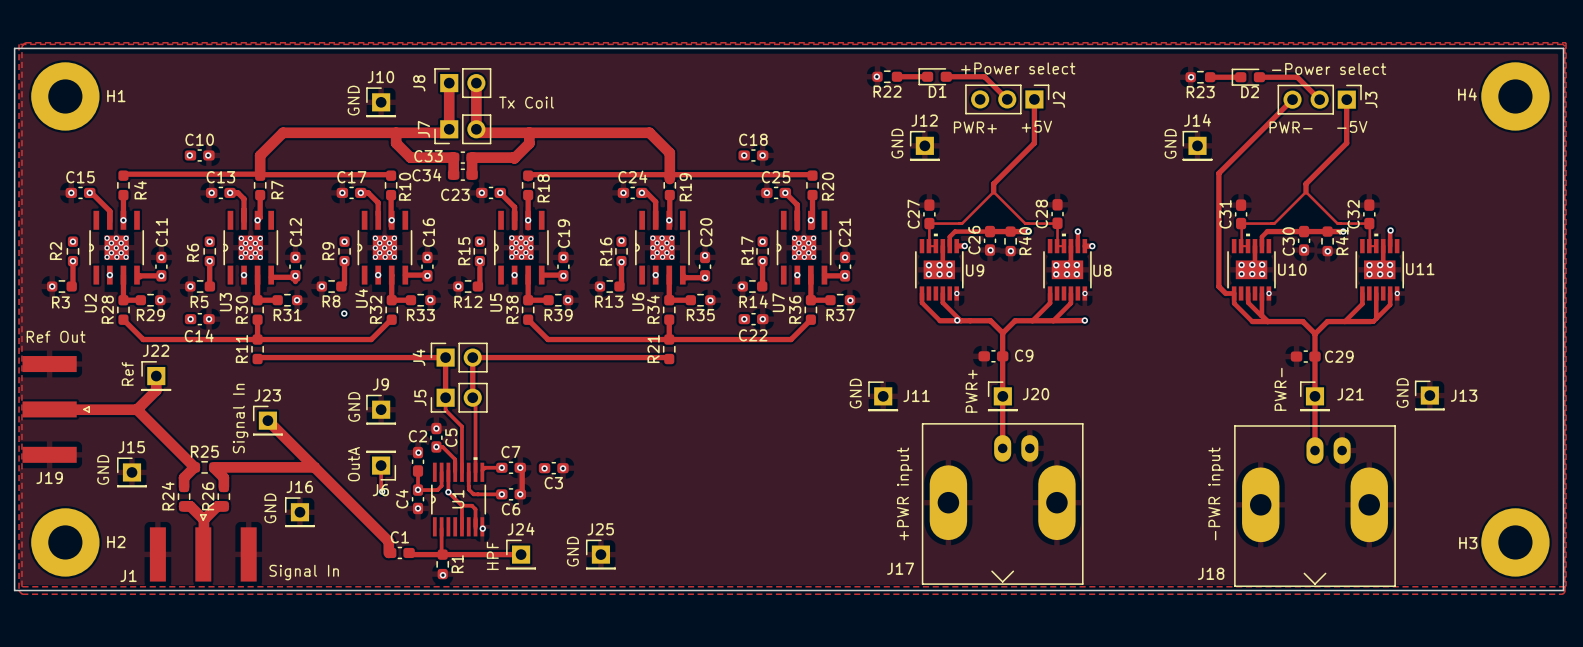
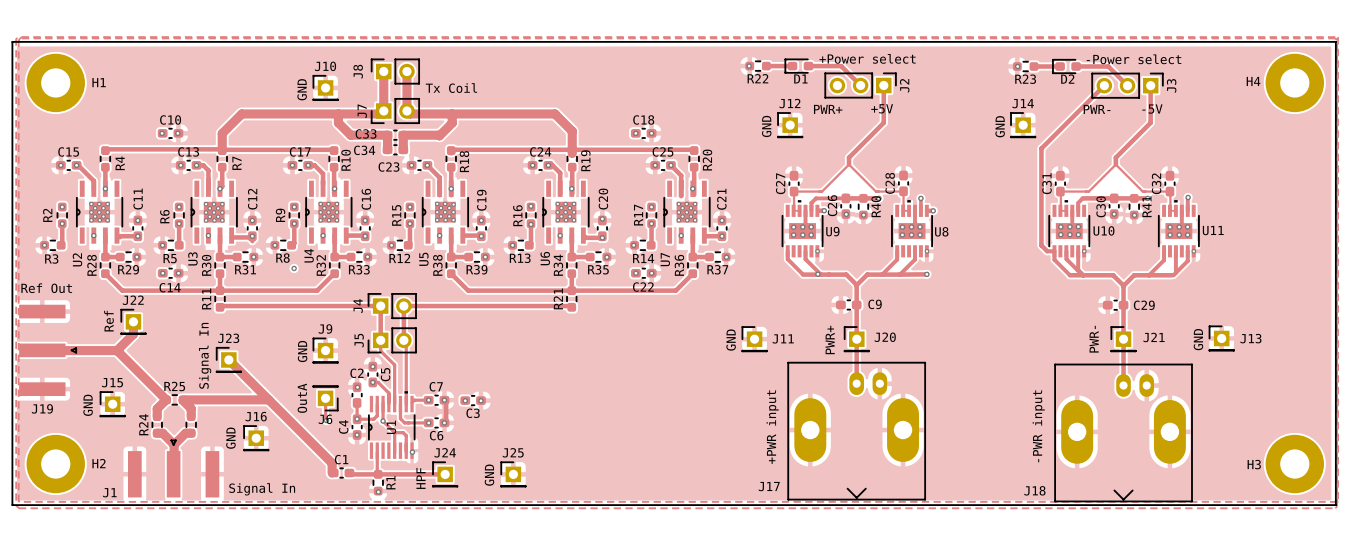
R26 name: R26 (208, 496) -> none

